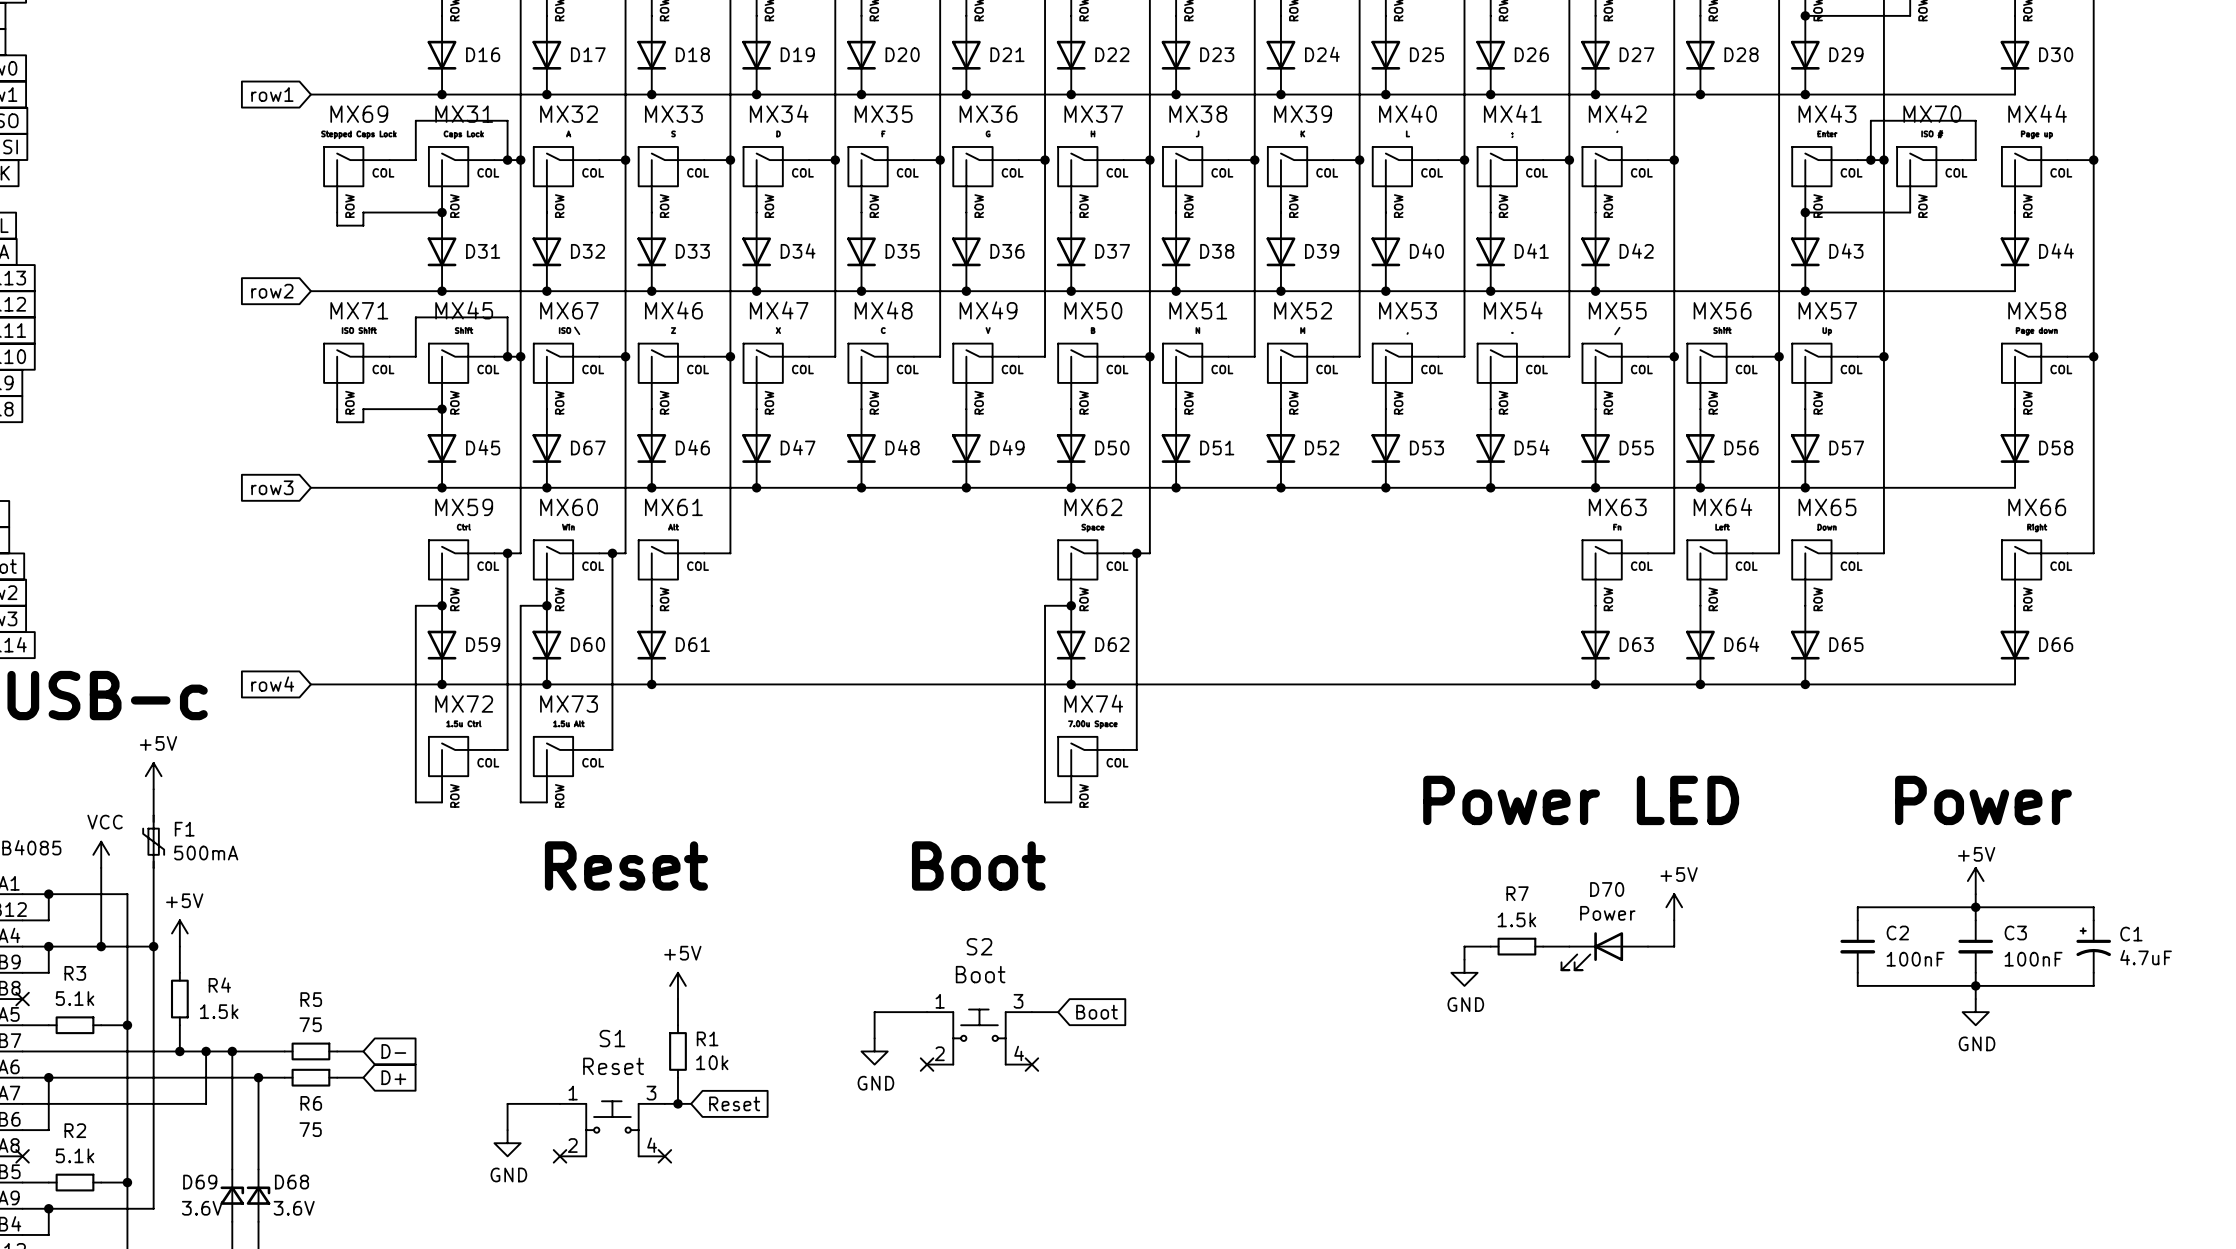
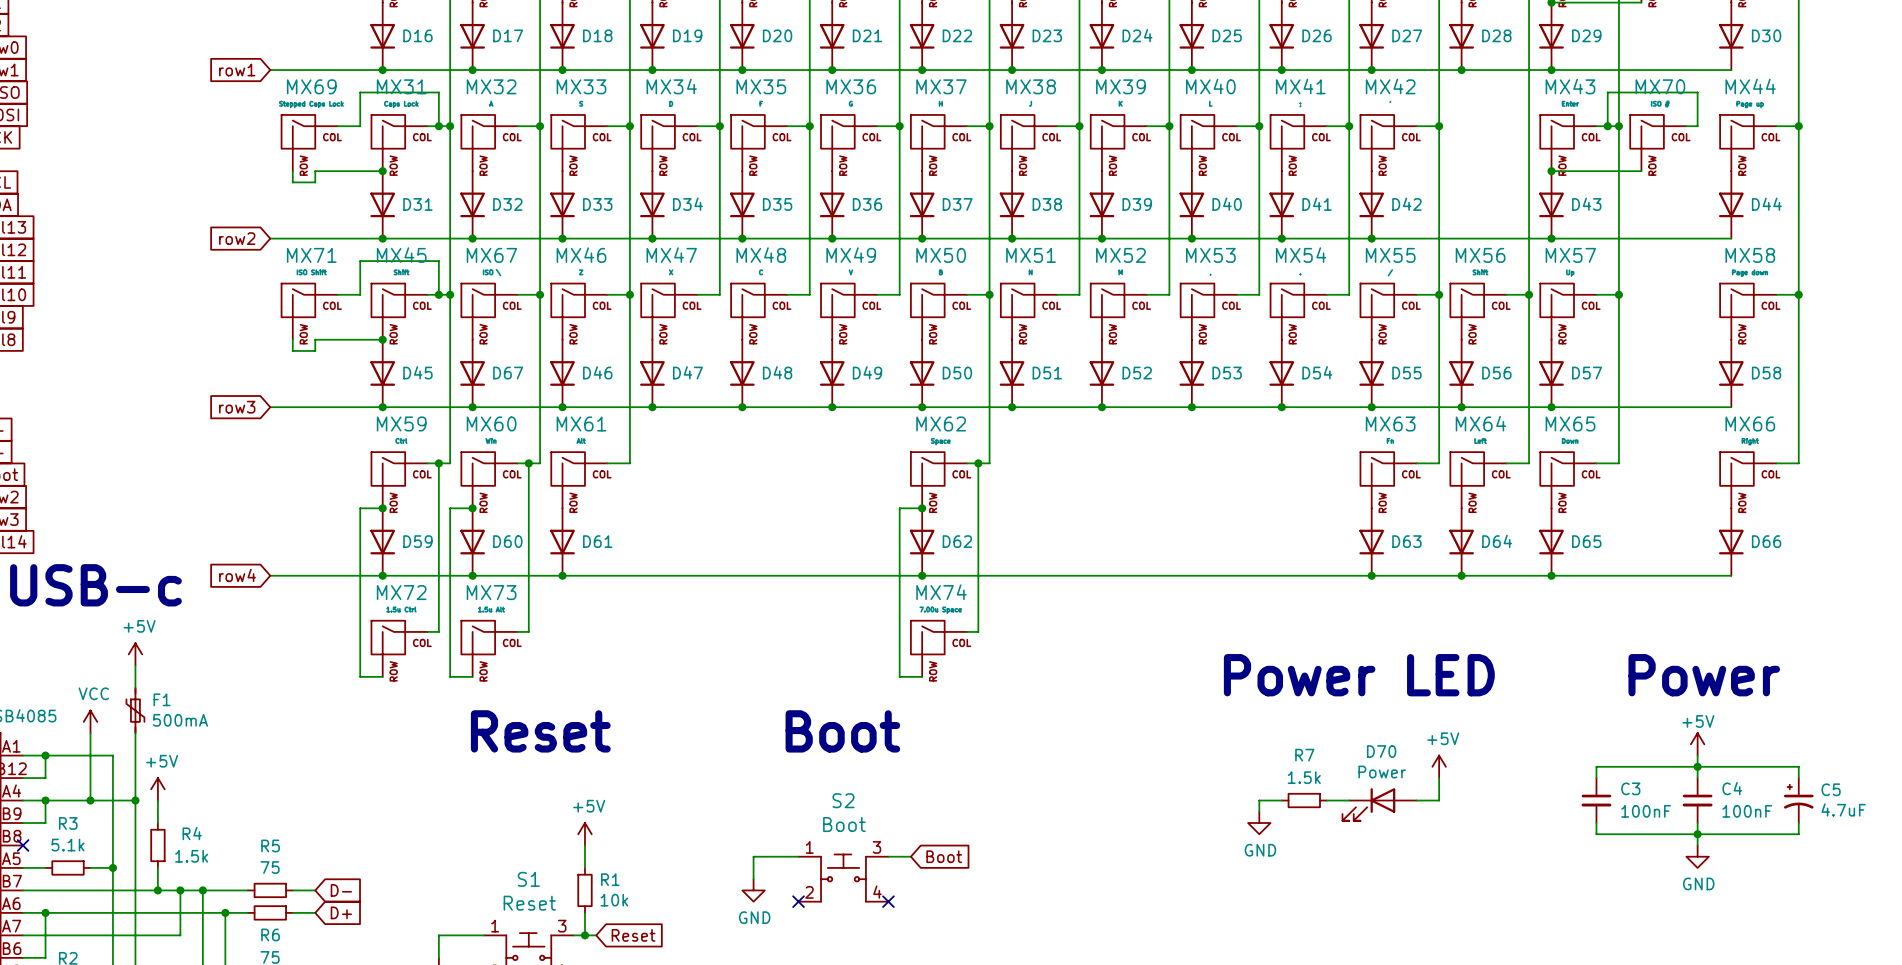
C2 name: C2 (1897, 933) -> C3 (1630, 788)
C3 name: C3 (2015, 933) -> C4 (1732, 788)
C1 name: C1 (2131, 934) -> C5 (1831, 789)

